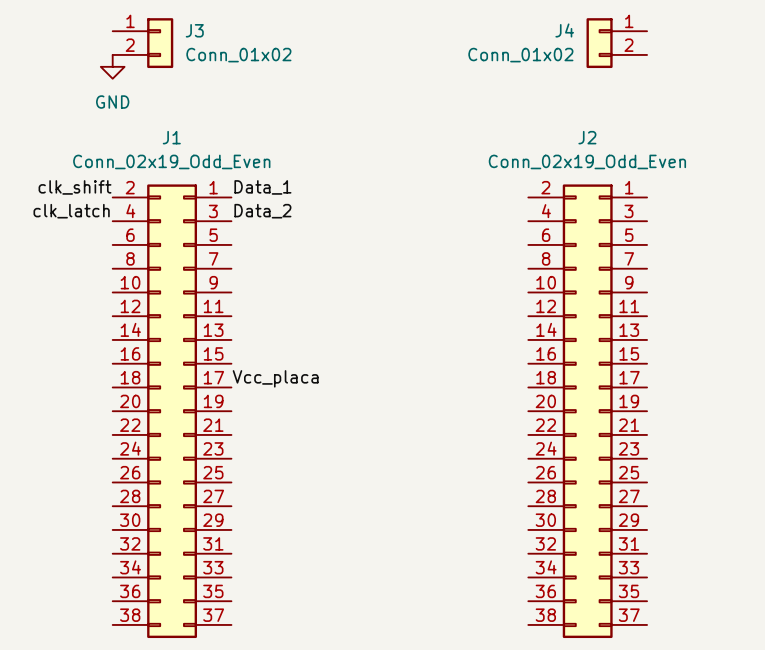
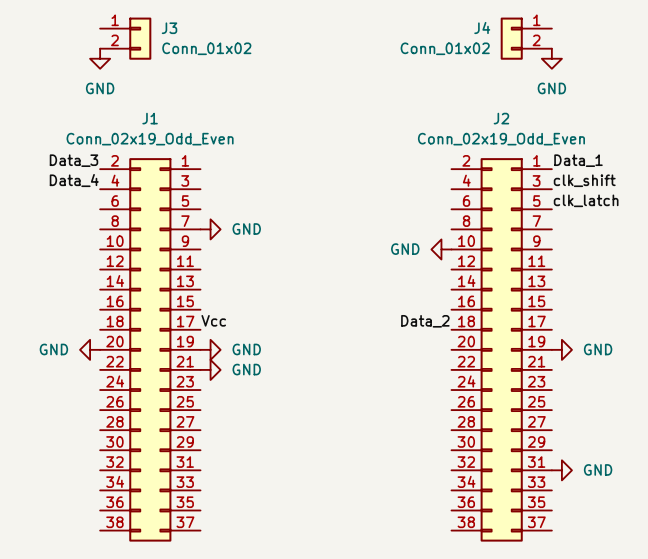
power symbol: none -> GND (551, 58)
label: clk_shift (75, 187) -> Data_3 (73, 160)
label: Data_1 (262, 187) -> none
label: none -> Data_1 (578, 160)
label: clk_latch (71, 211) -> Data_4 (74, 180)
label: Data_2 (262, 211) -> none
label: none -> clk_shift (584, 180)
label: none -> clk_latch (586, 200)
power symbol: none -> GND (210, 229)
power symbol: none -> GND (441, 249)
label: none -> Data_2 (425, 321)
label: Vcc_placa (275, 378) -> Vcc (213, 320)
power symbol: none -> GND (90, 349)
power symbol: none -> GND (210, 349)
power symbol: none -> GND (561, 349)
power symbol: none -> GND (210, 369)
power symbol: none -> GND (561, 470)

